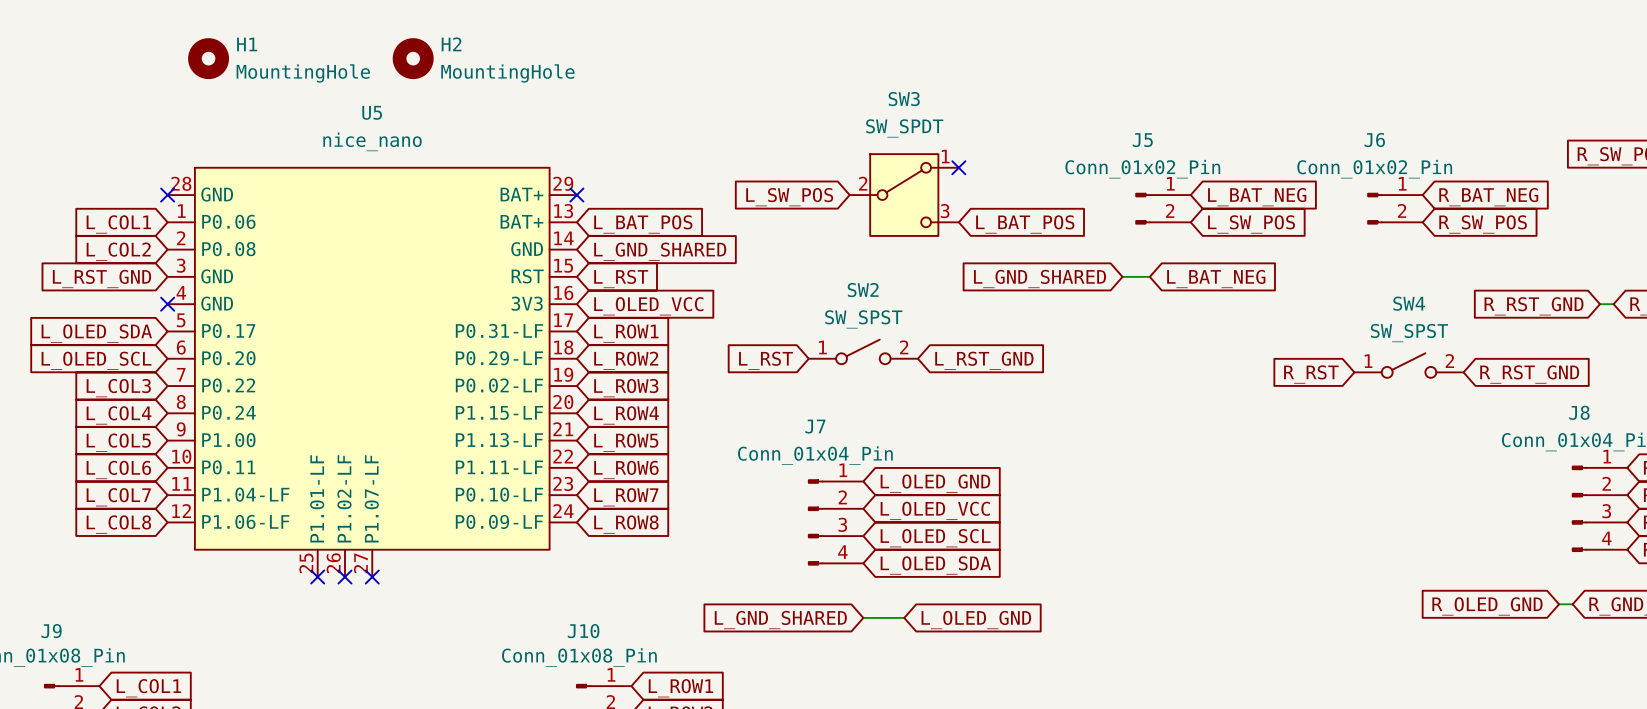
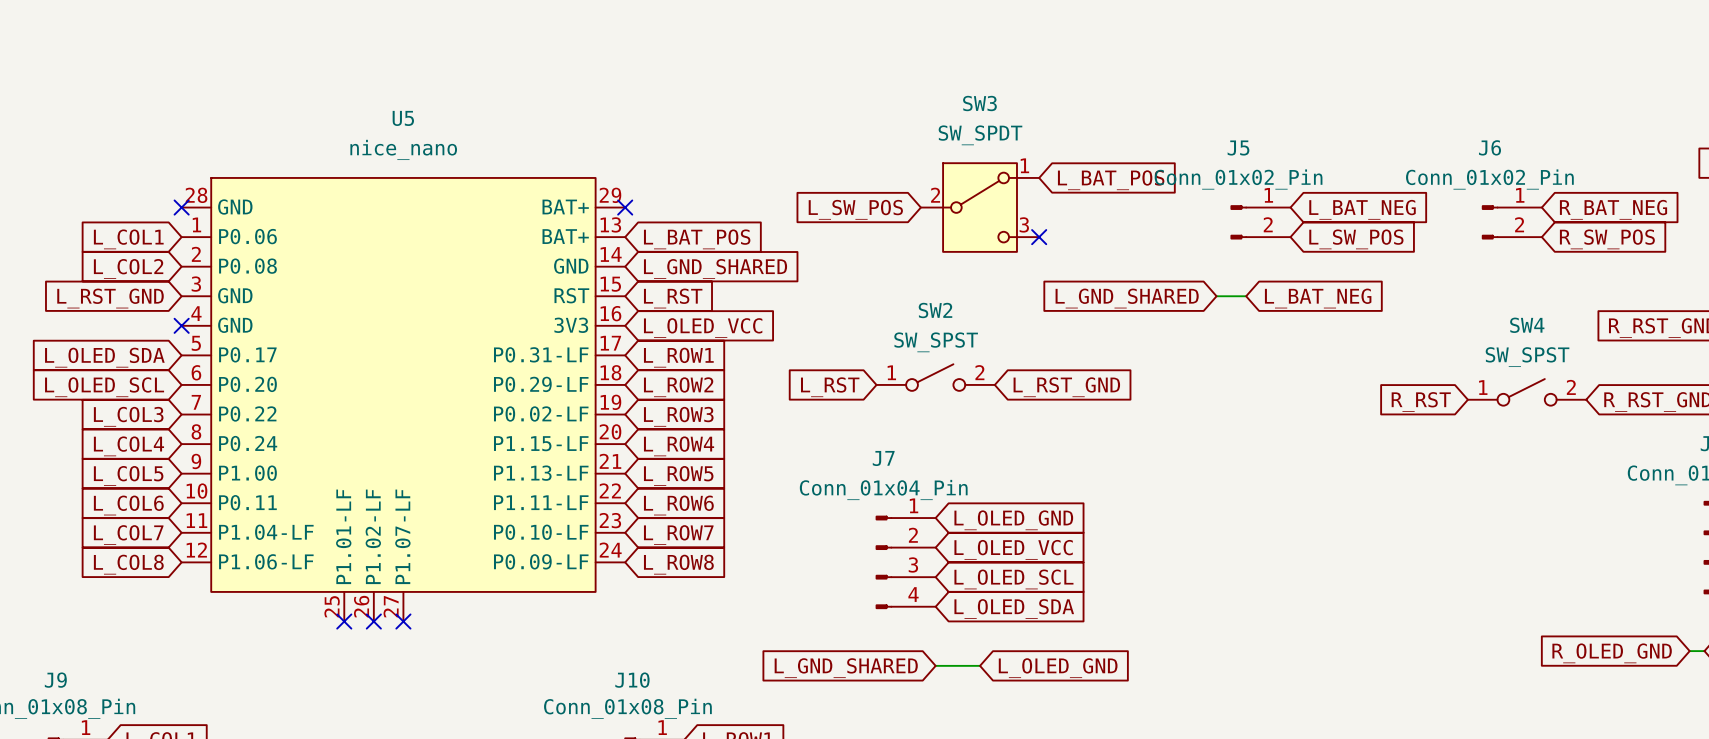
H1: MountingHole (208, 58) -> none
H2: MountingHole (413, 58) -> none
no-connect mark position: (958, 167) -> (1039, 237)
global label position: L_BAT_POS (1025, 224) -> L_BAT_POS (1111, 180)

